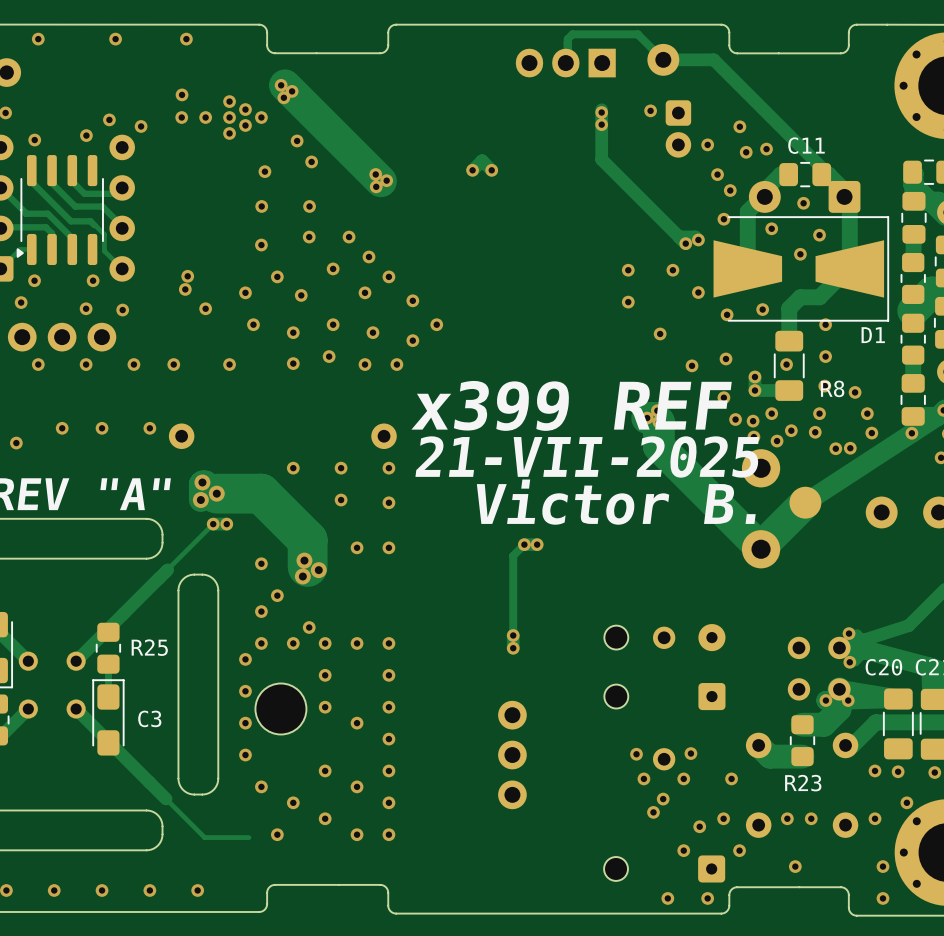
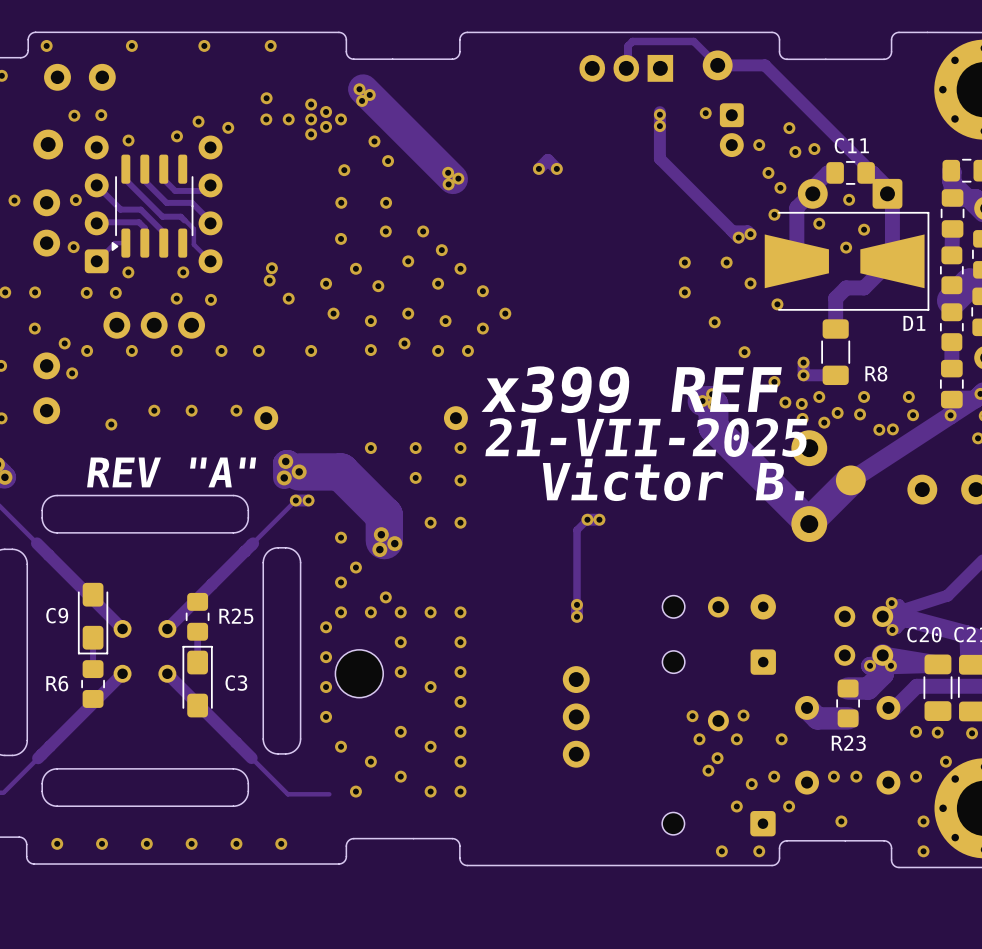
via: (762, 309) -> none
via: (825, 324) -> none
via: (825, 356) -> none
via: (726, 358) -> none
via: (786, 364) -> none
via: (824, 386) -> none
via: (855, 392) -> none

